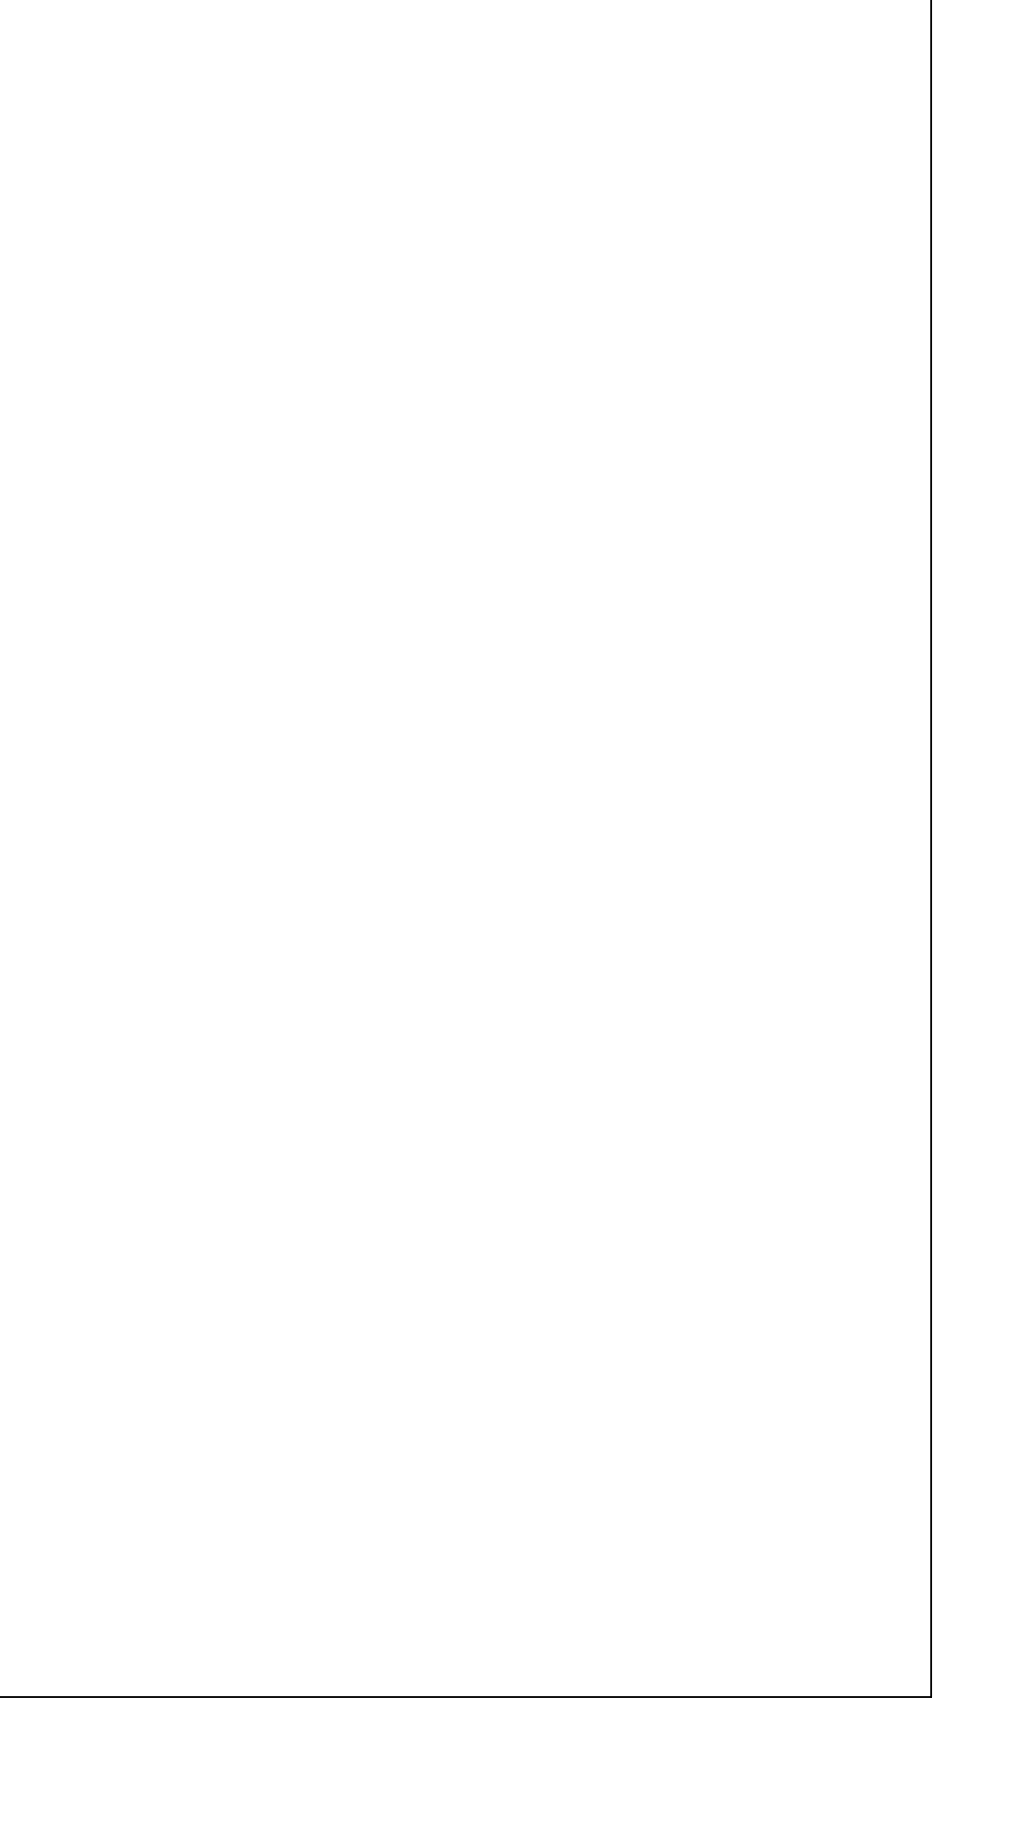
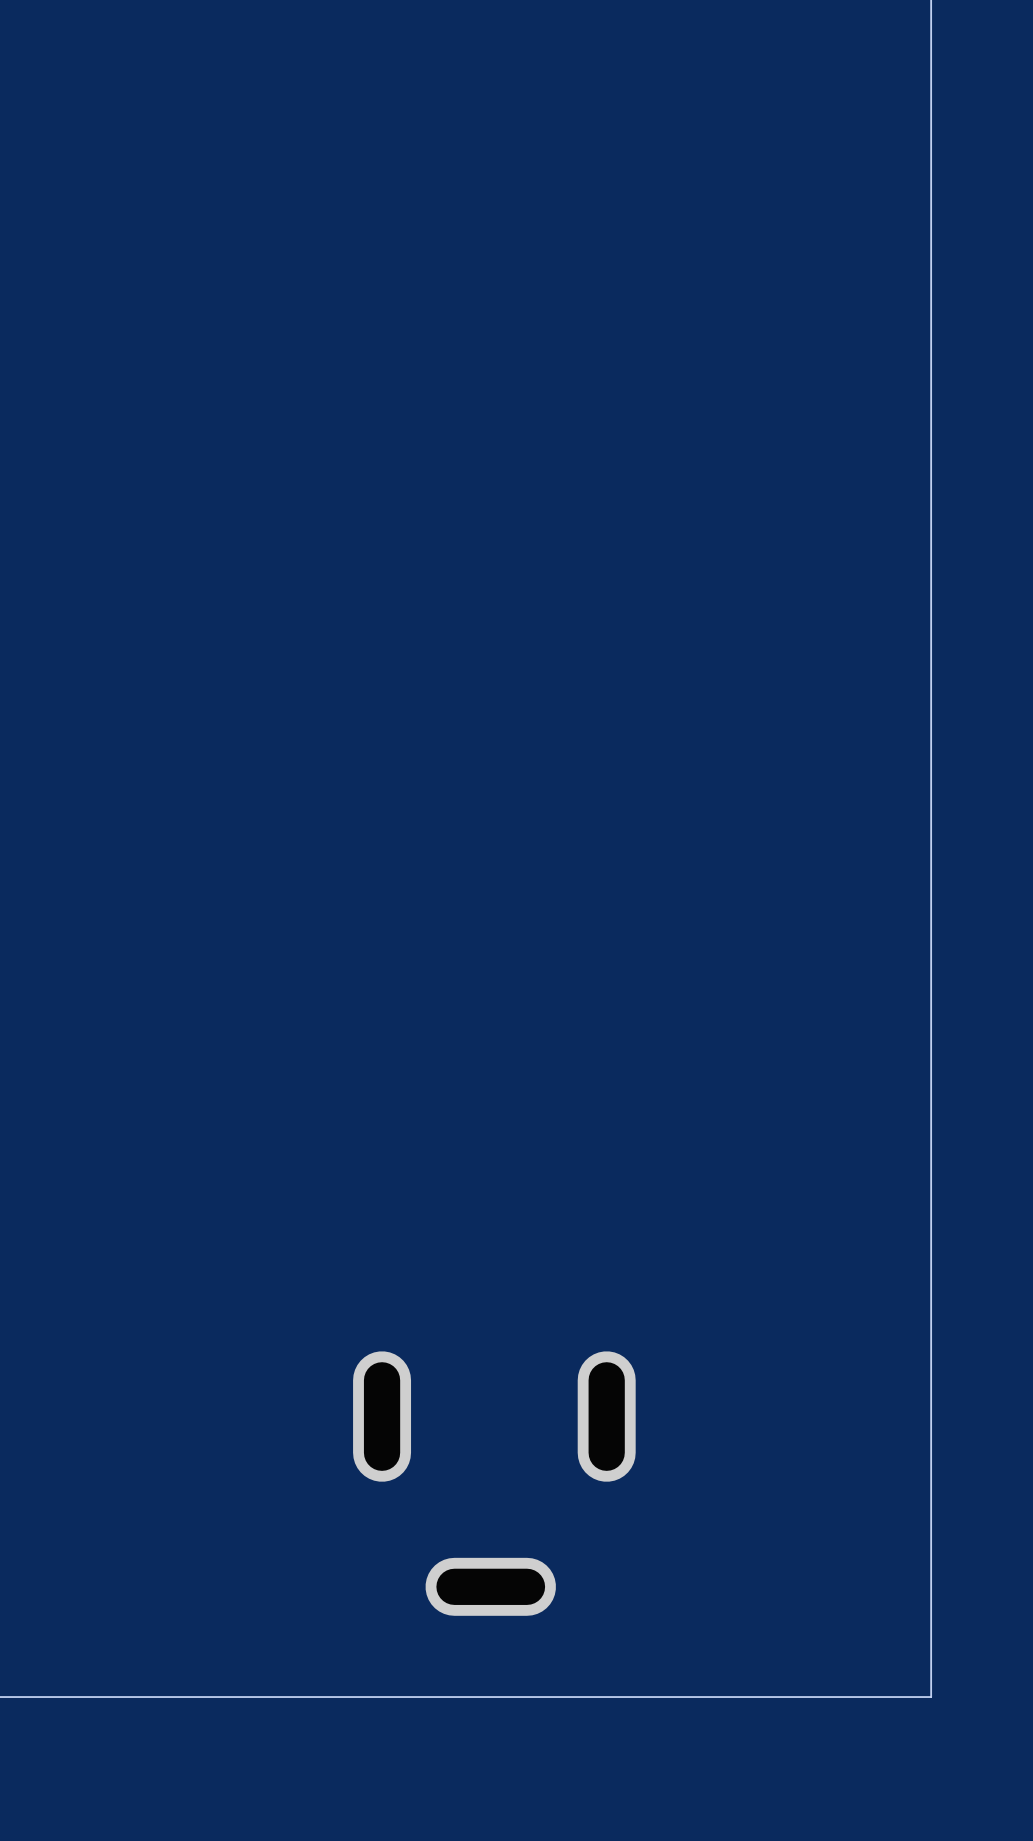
part: none -> (494, 1483)

